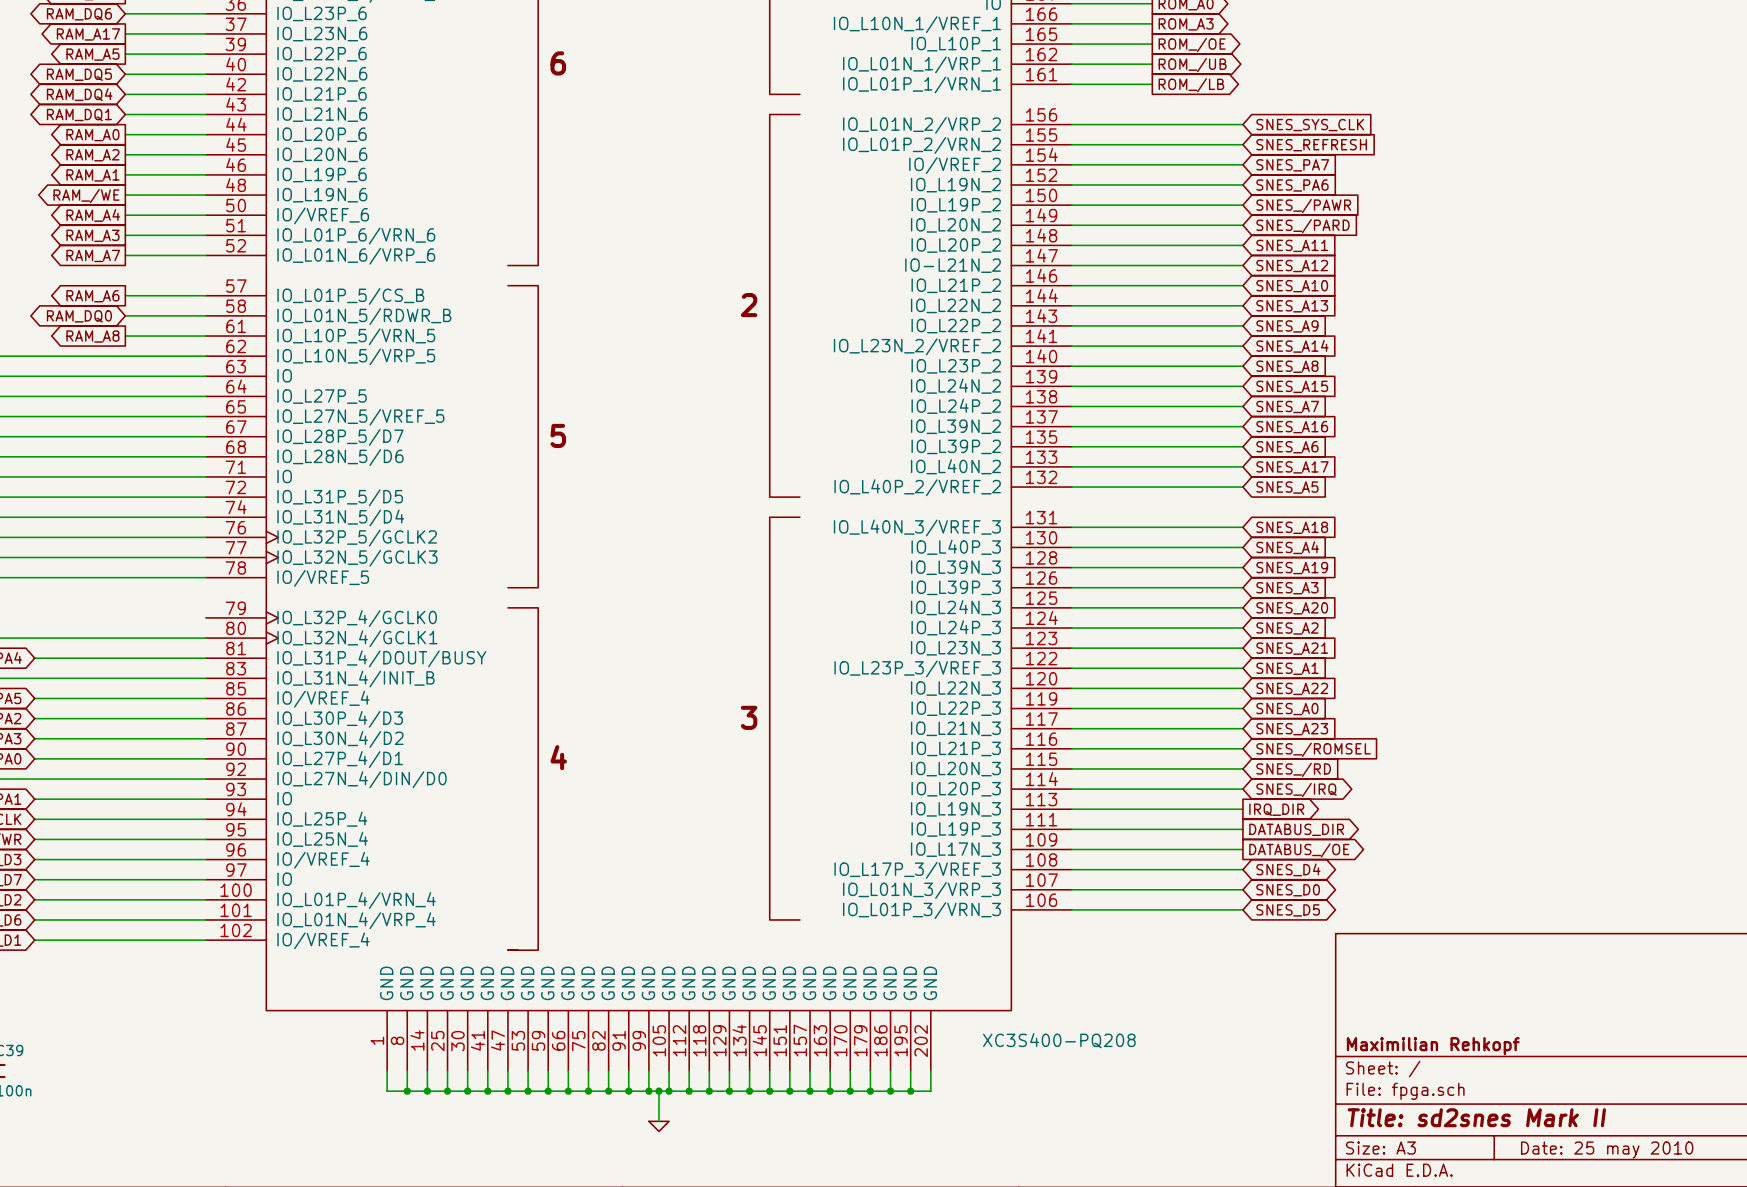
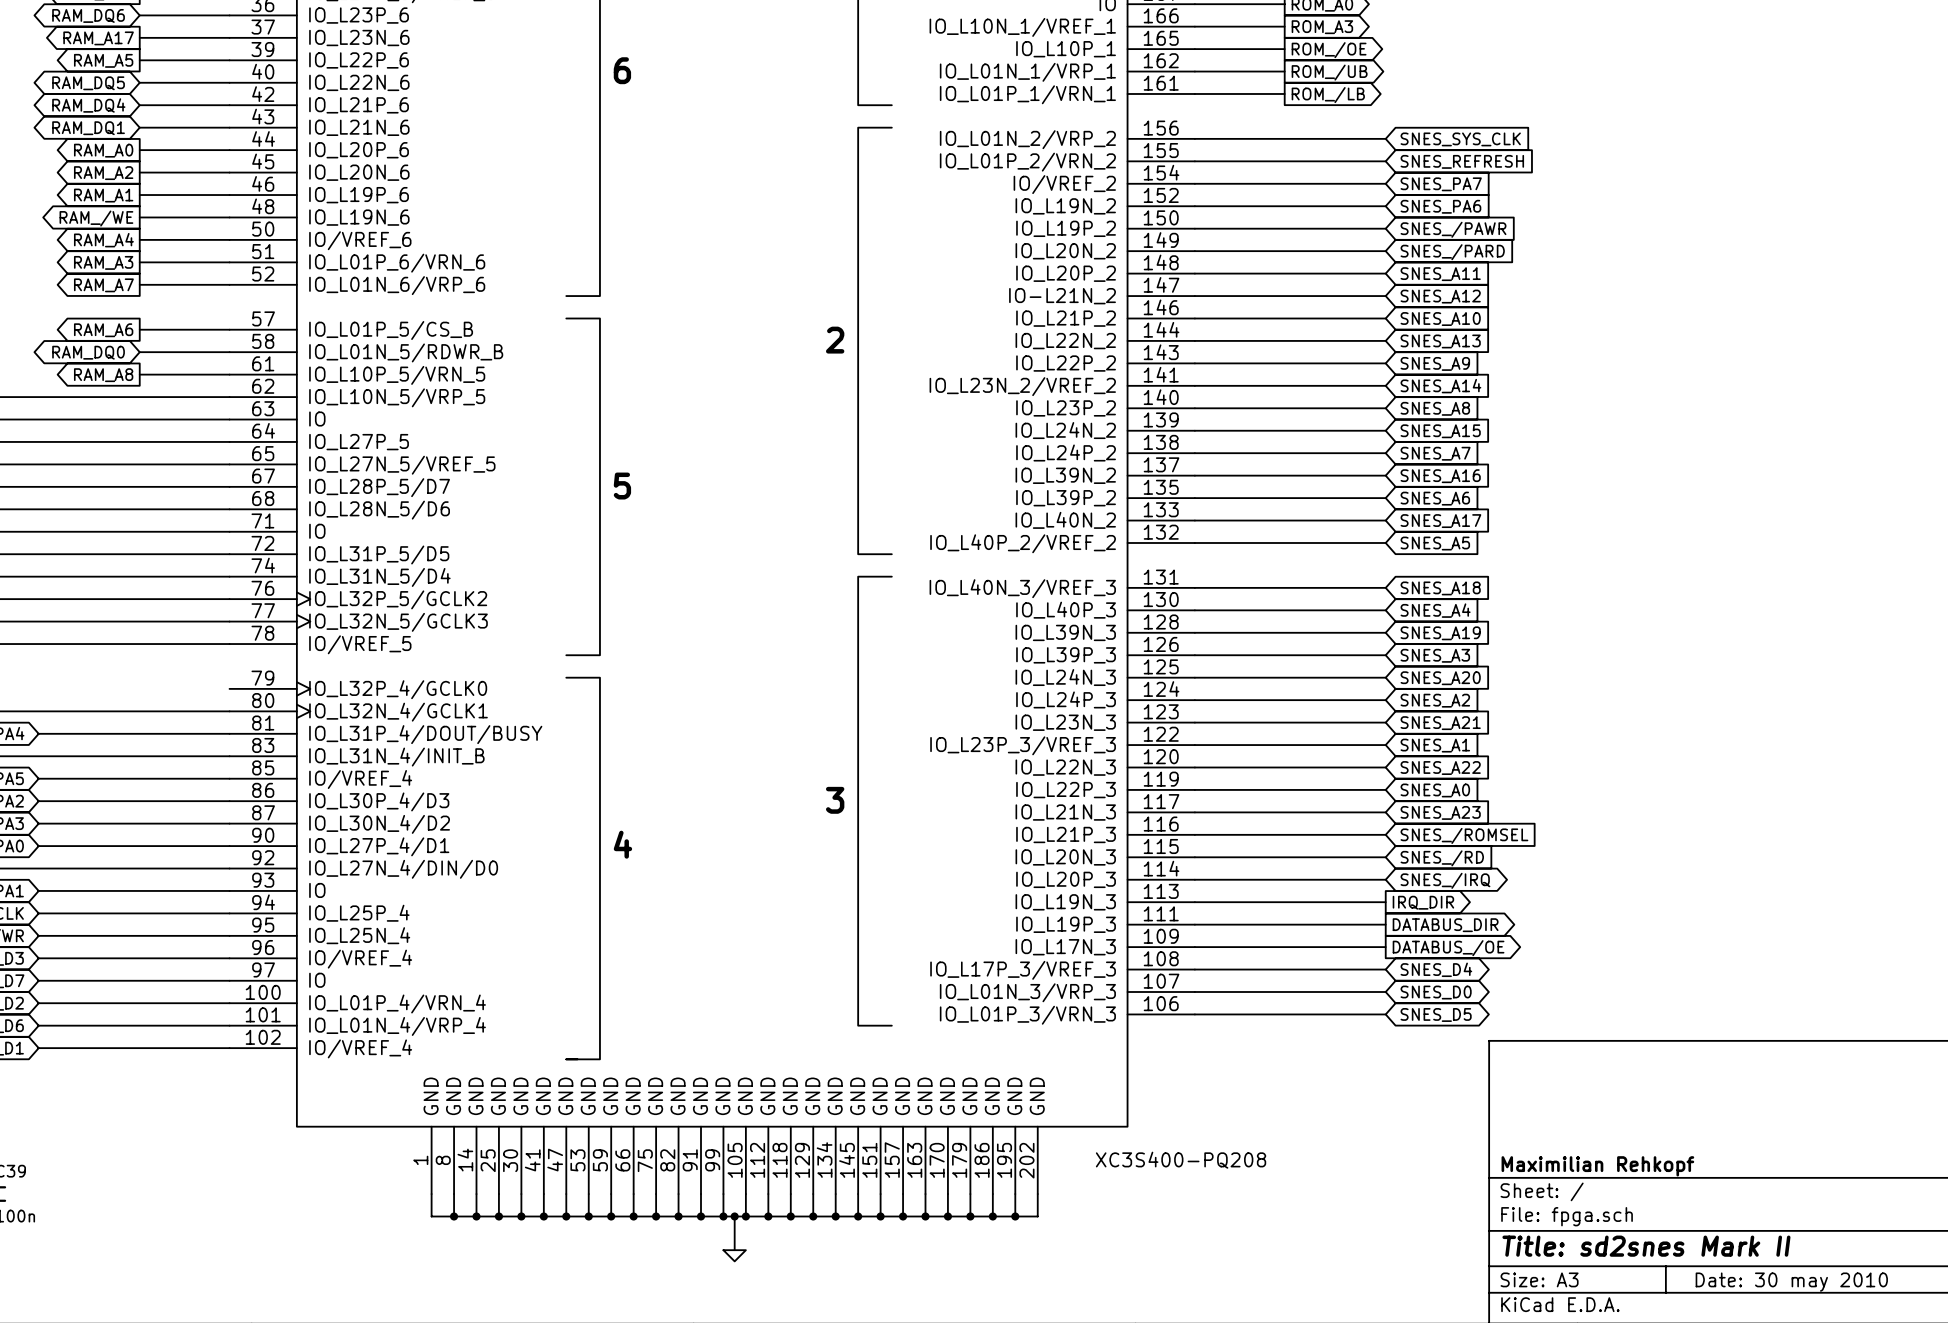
title block: Date: 25 may 2010 (1607, 1150) -> Date: 30 may 2010 (1791, 1282)

